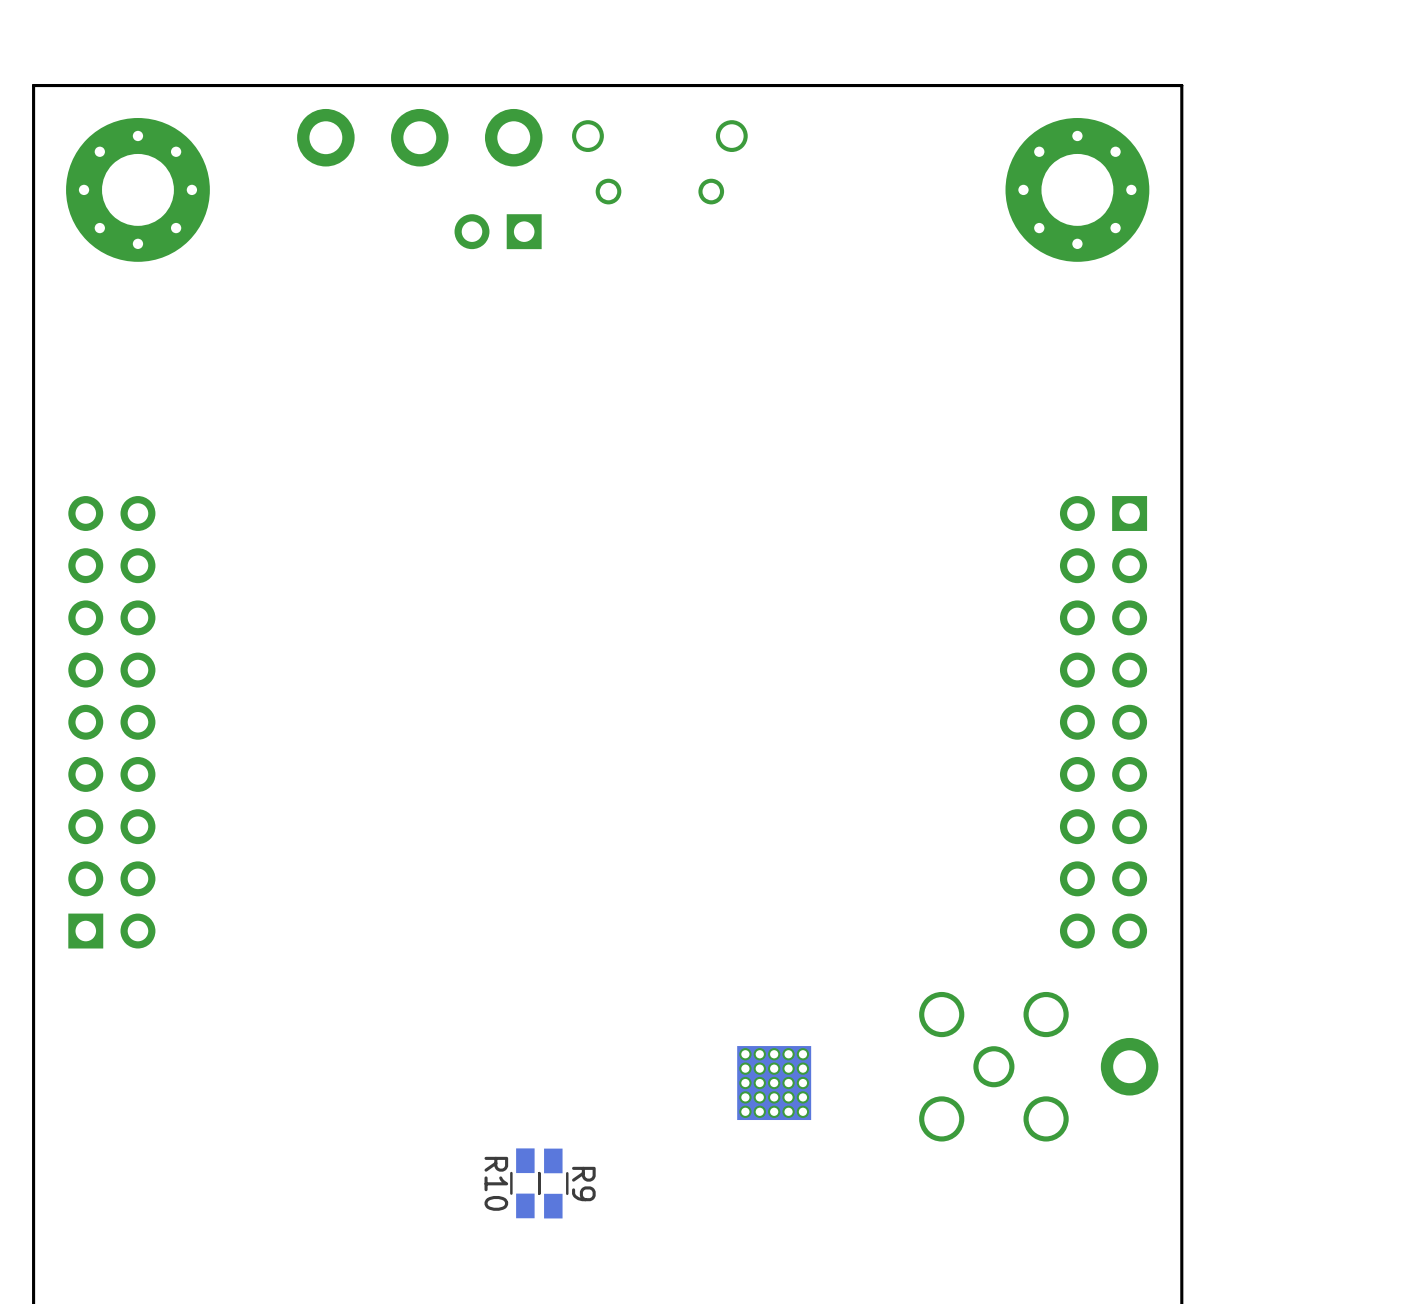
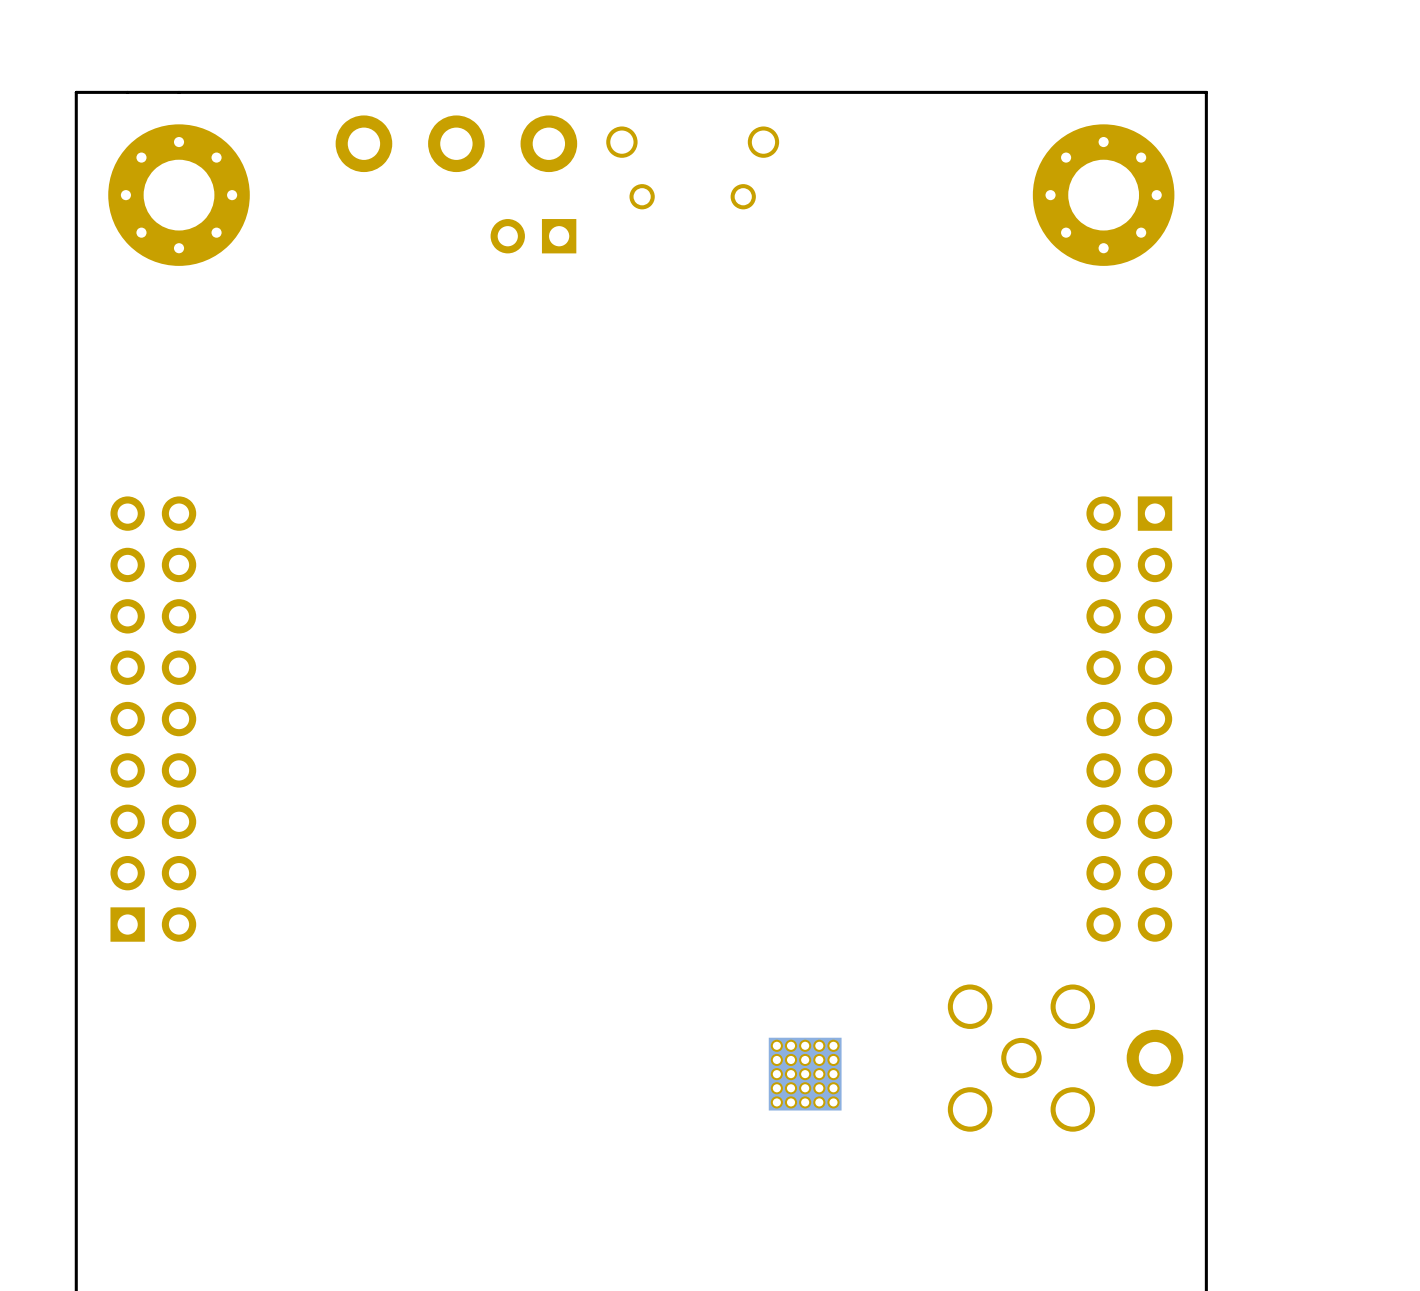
R10: (525, 1183) -> none
R9: (553, 1183) -> none

